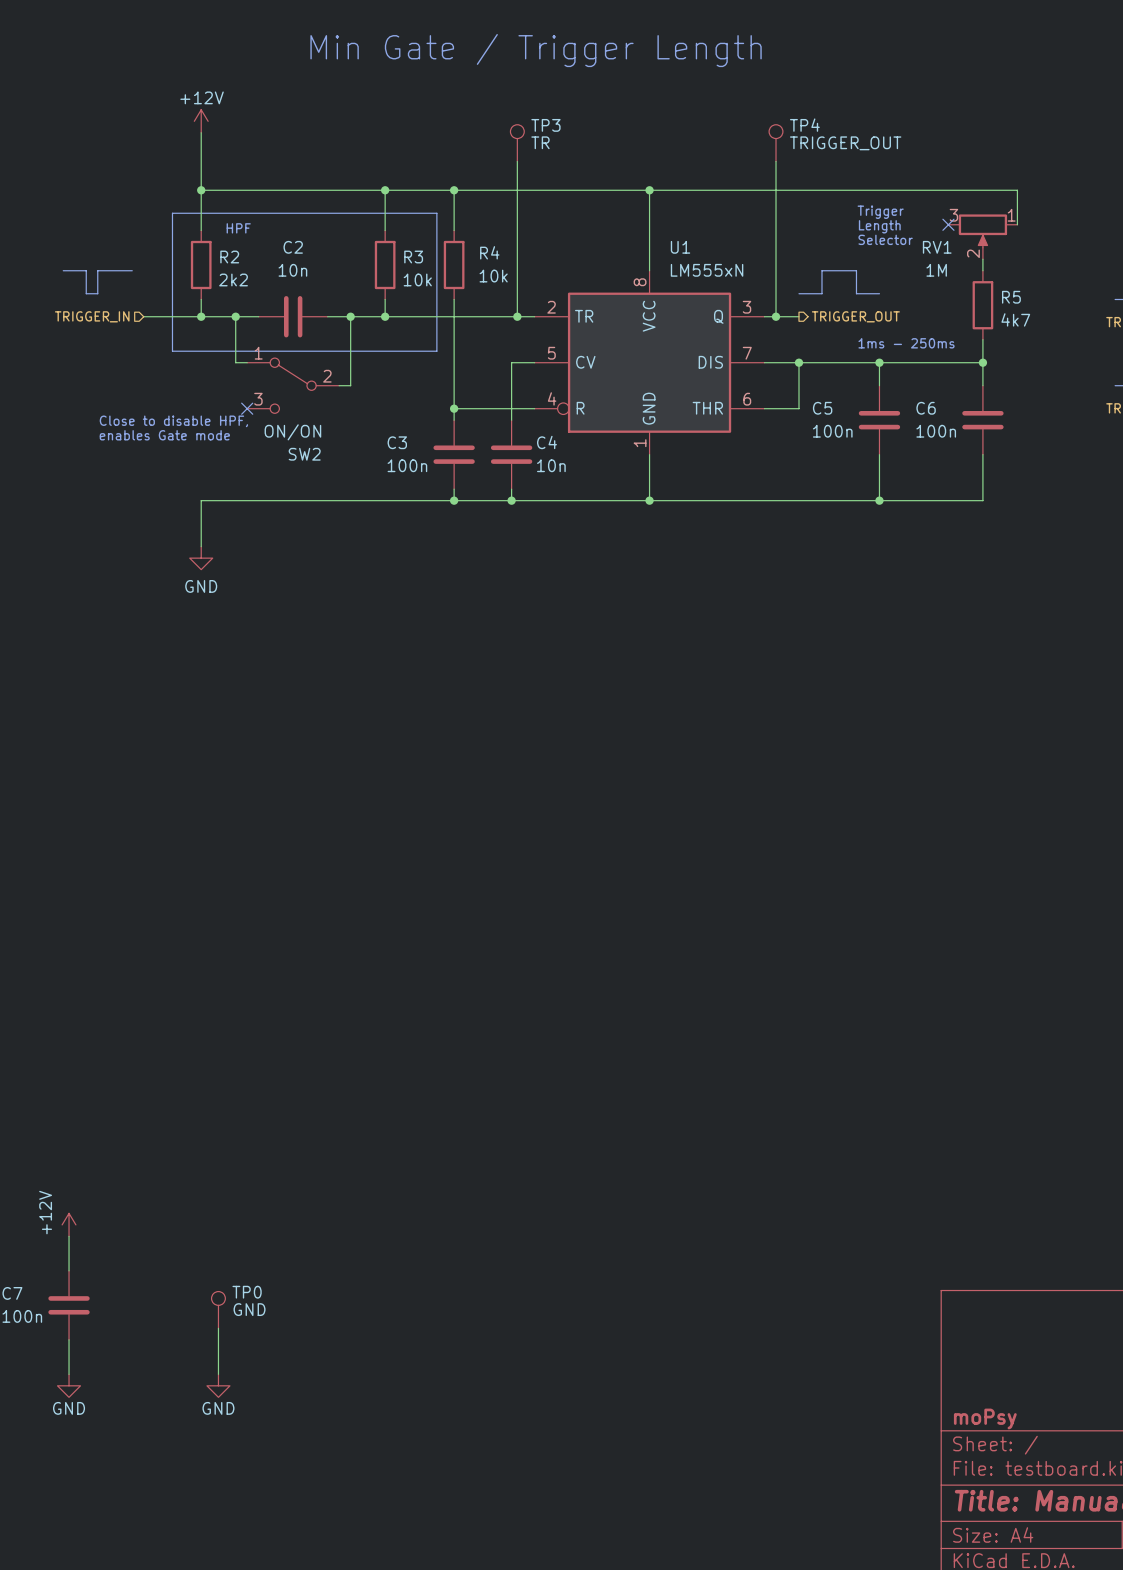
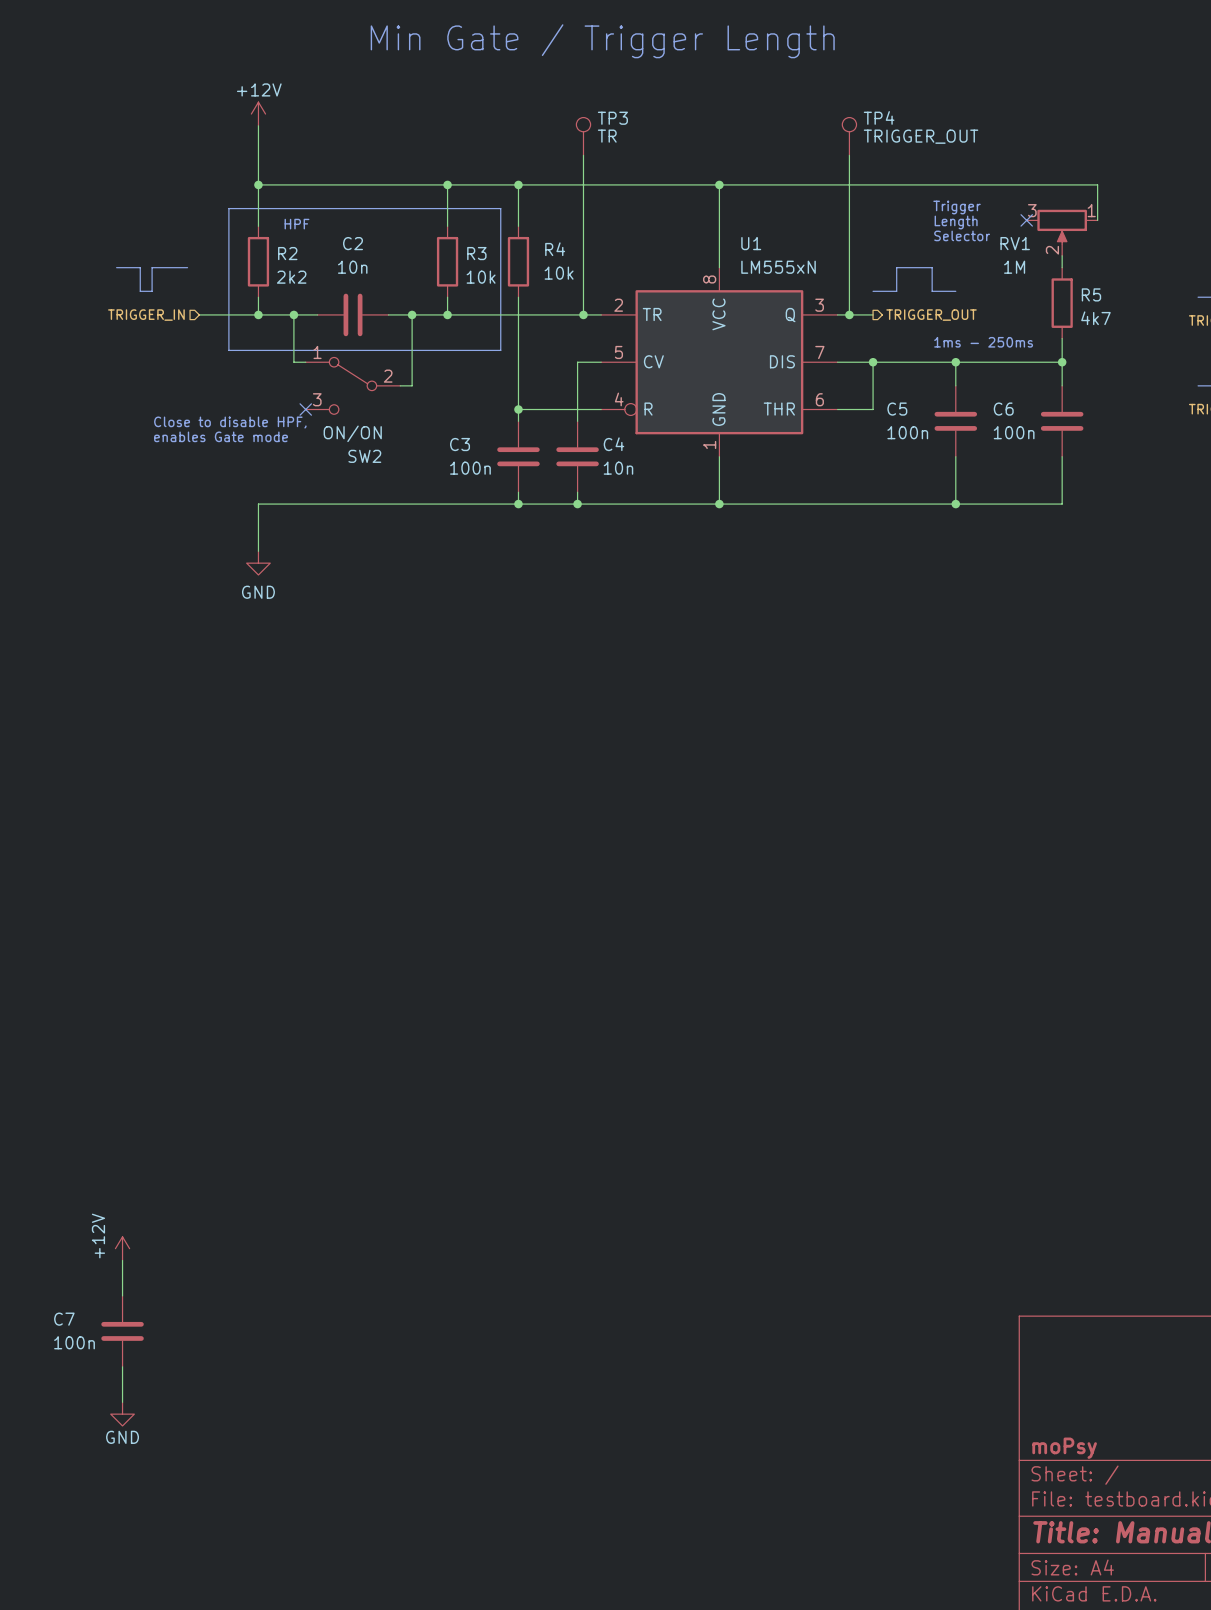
TP0: GND (218, 1309) -> none
wire: (218, 1328) (218, 1374) -> none
power symbol: GND (218, 1385) -> none

